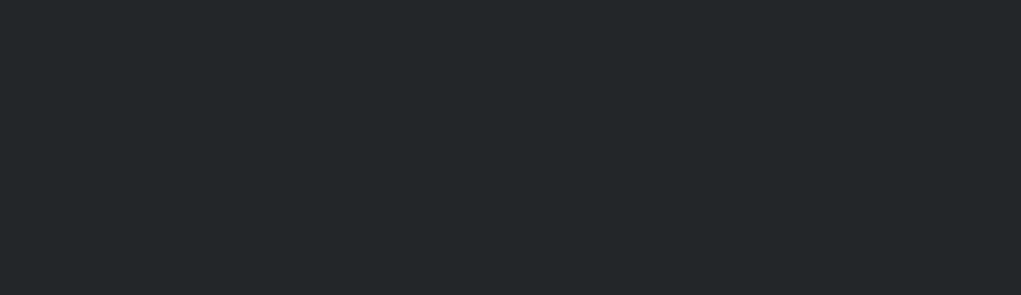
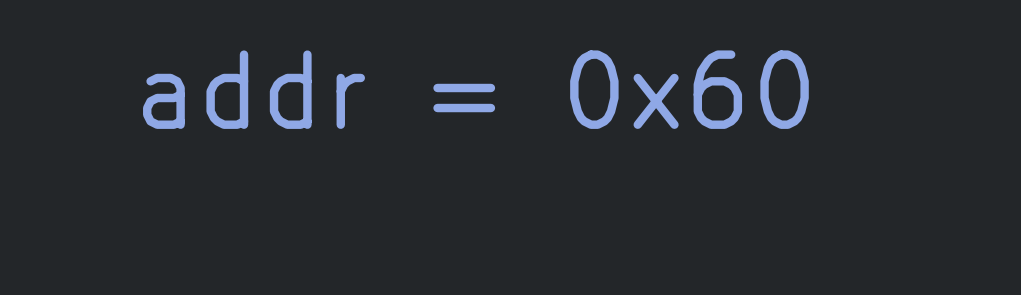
text: none -> addr = 0x60 (475, 89)

